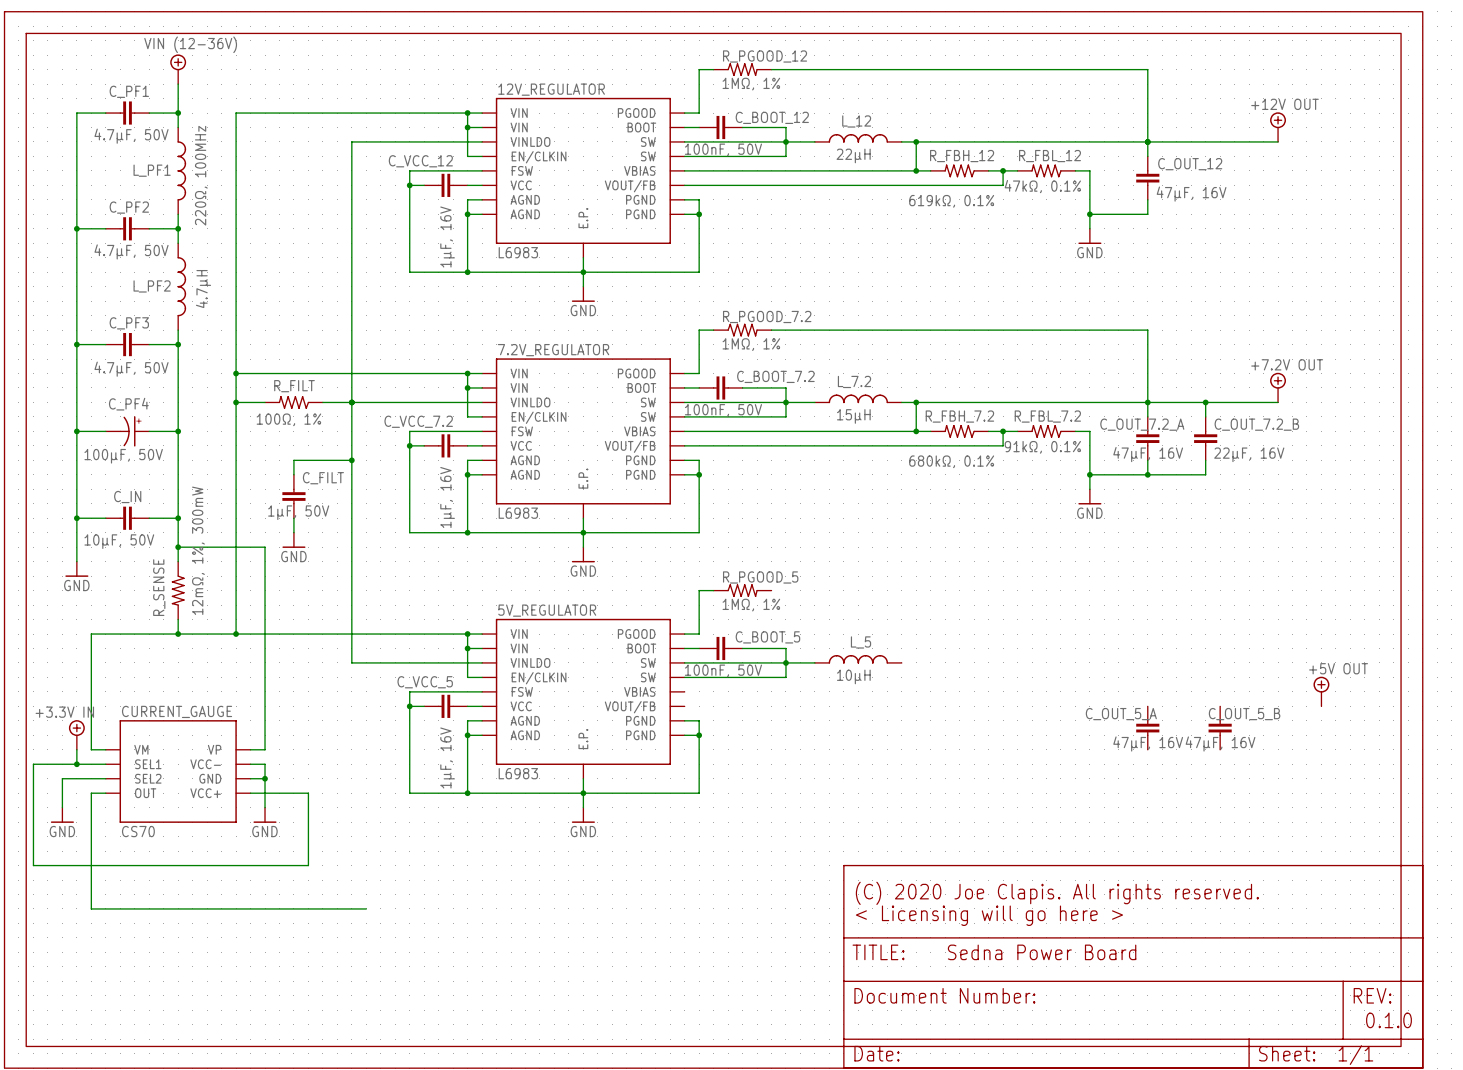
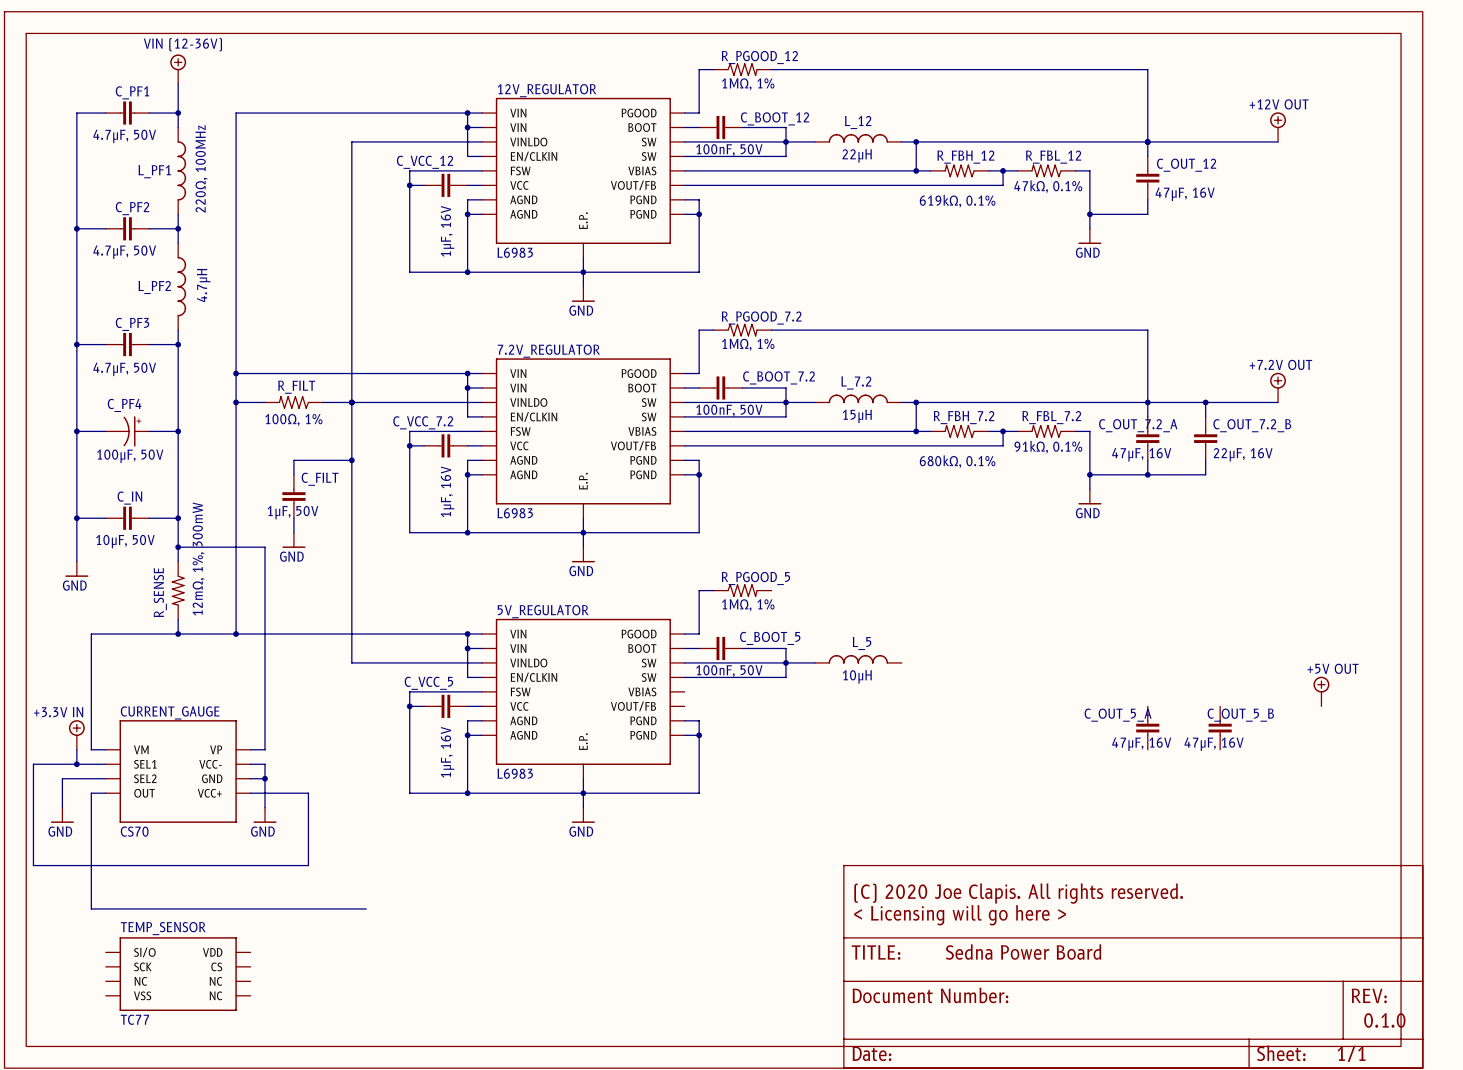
TEMP_SENSOR: none -> TC77 (178, 974)

